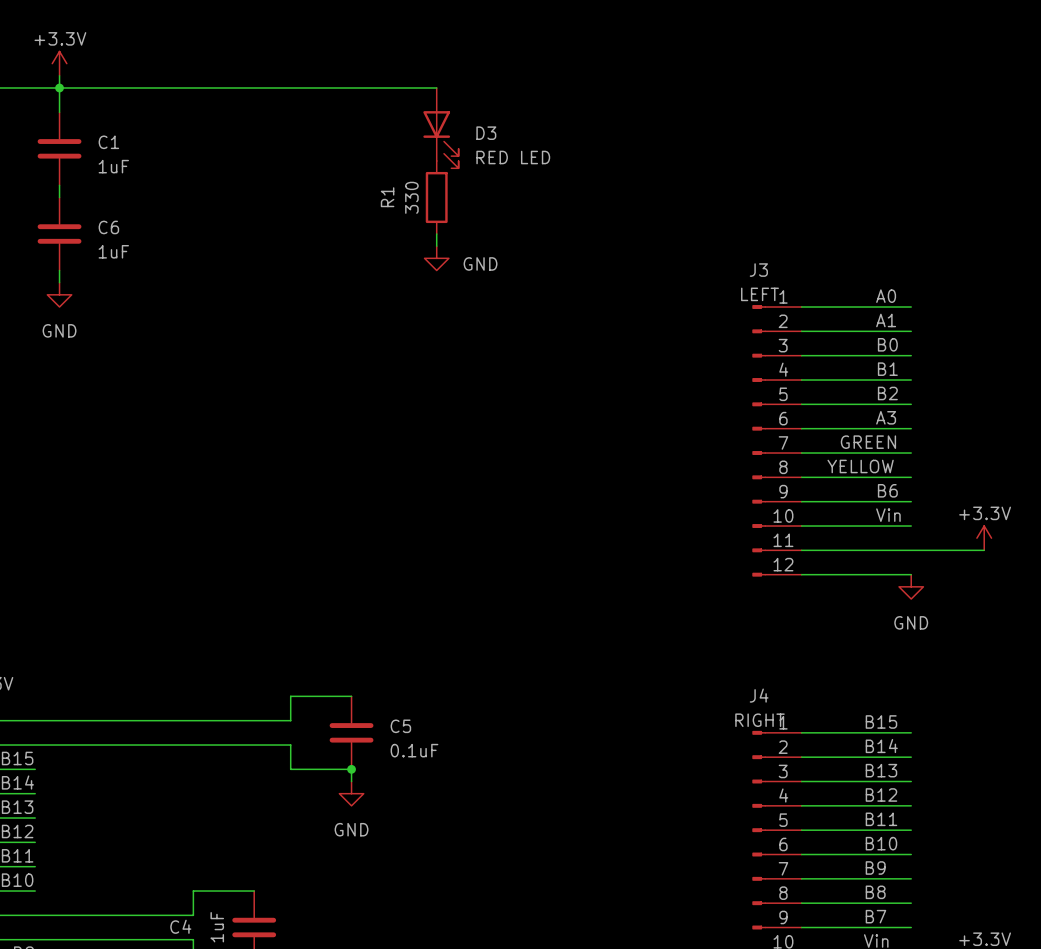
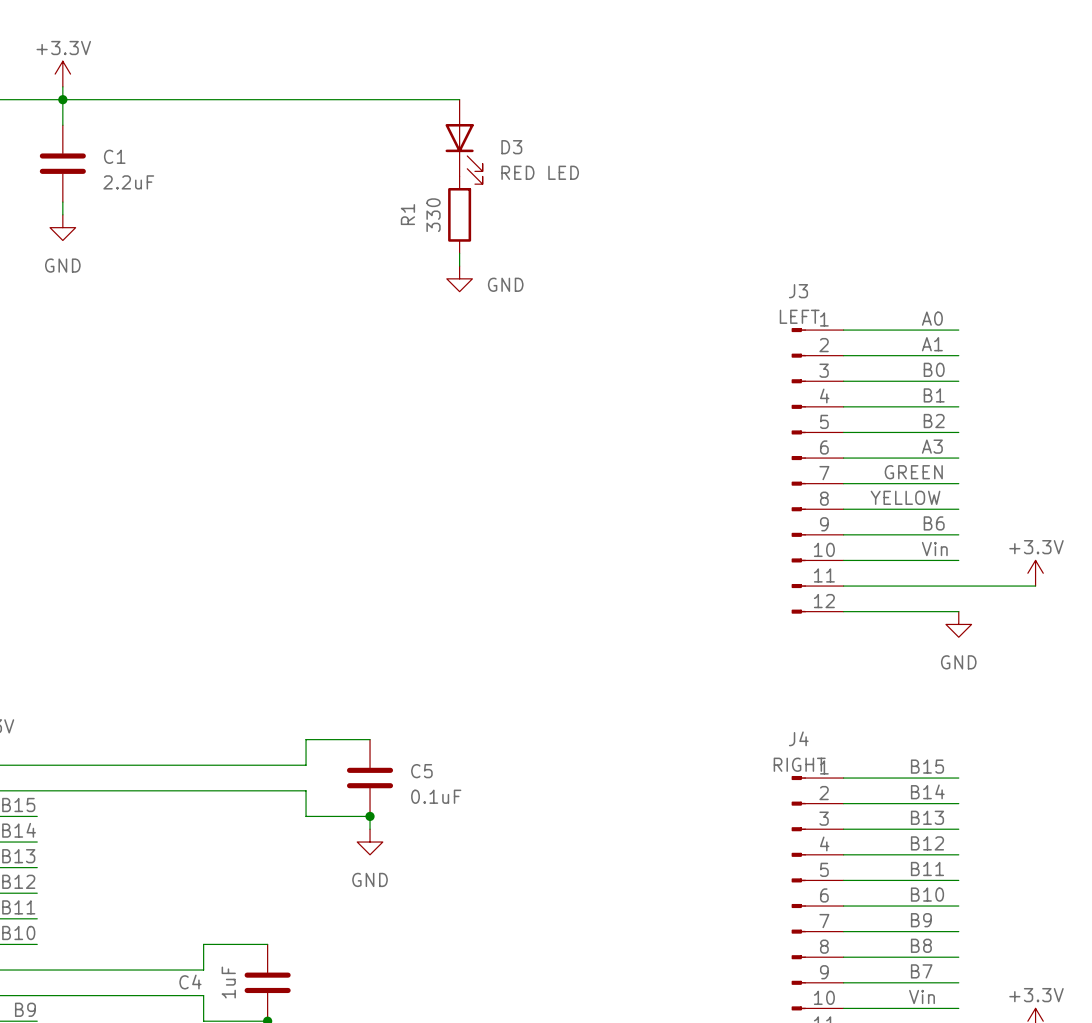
C1 value: 1uF (113, 166) -> 2.2uF (128, 182)
C6: 1uF (59, 234) -> none
wire: (59, 270) (59, 282) -> none
power symbol position: GND (59, 294) -> GND (62, 227)

